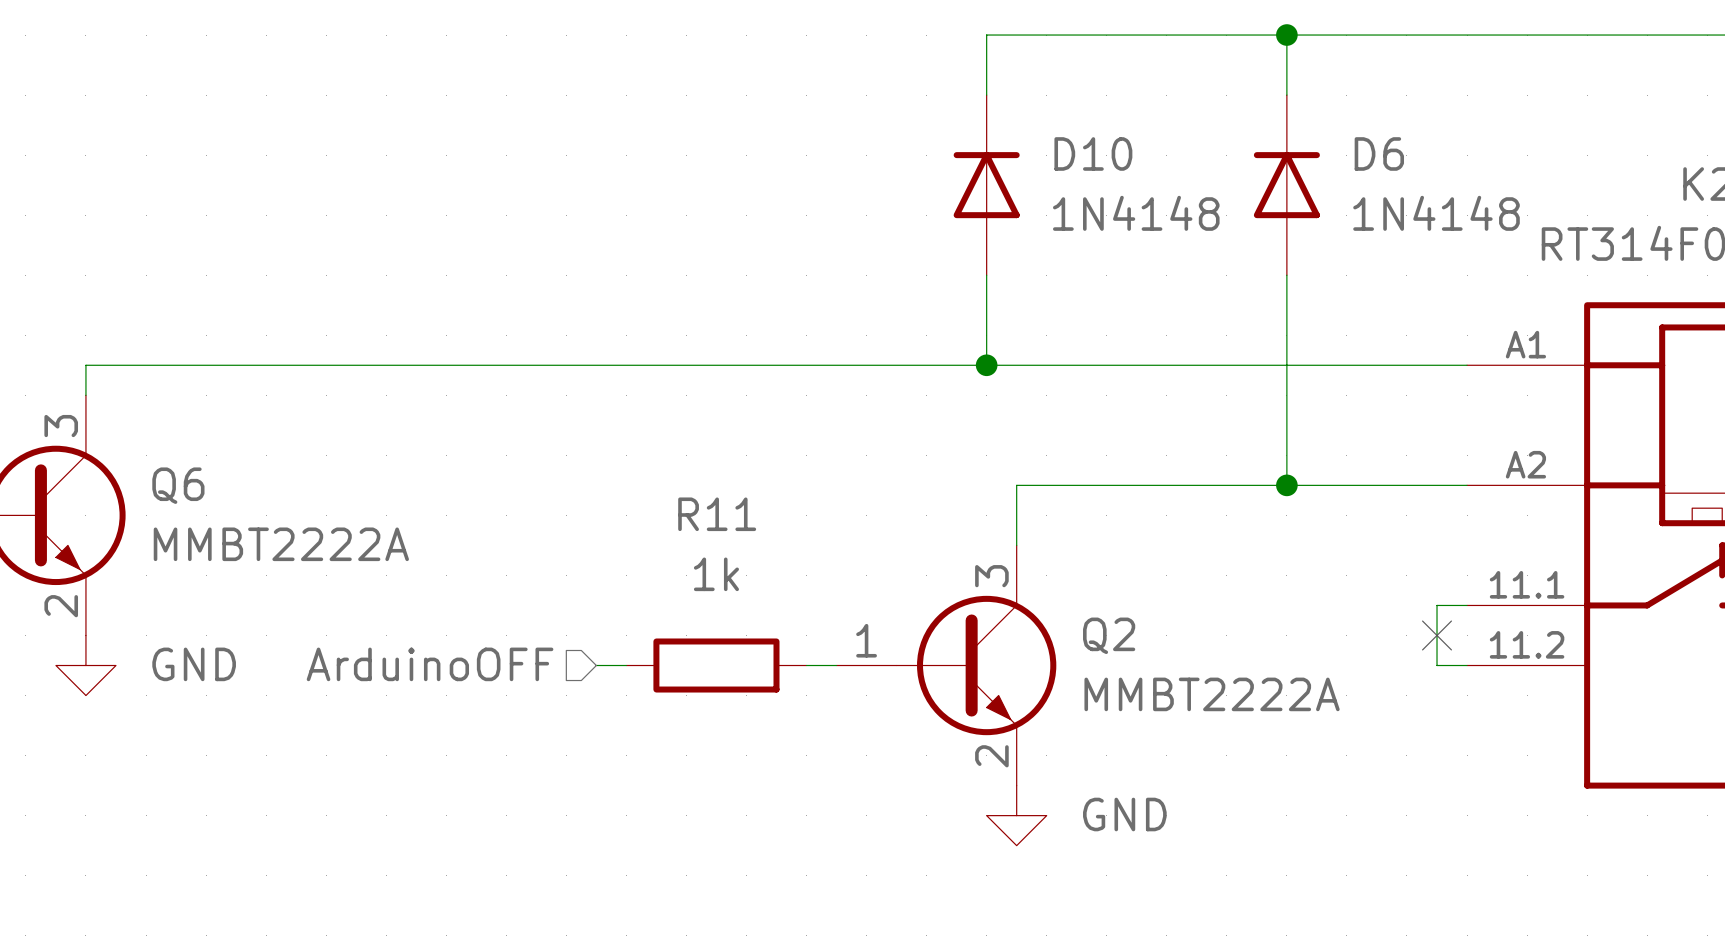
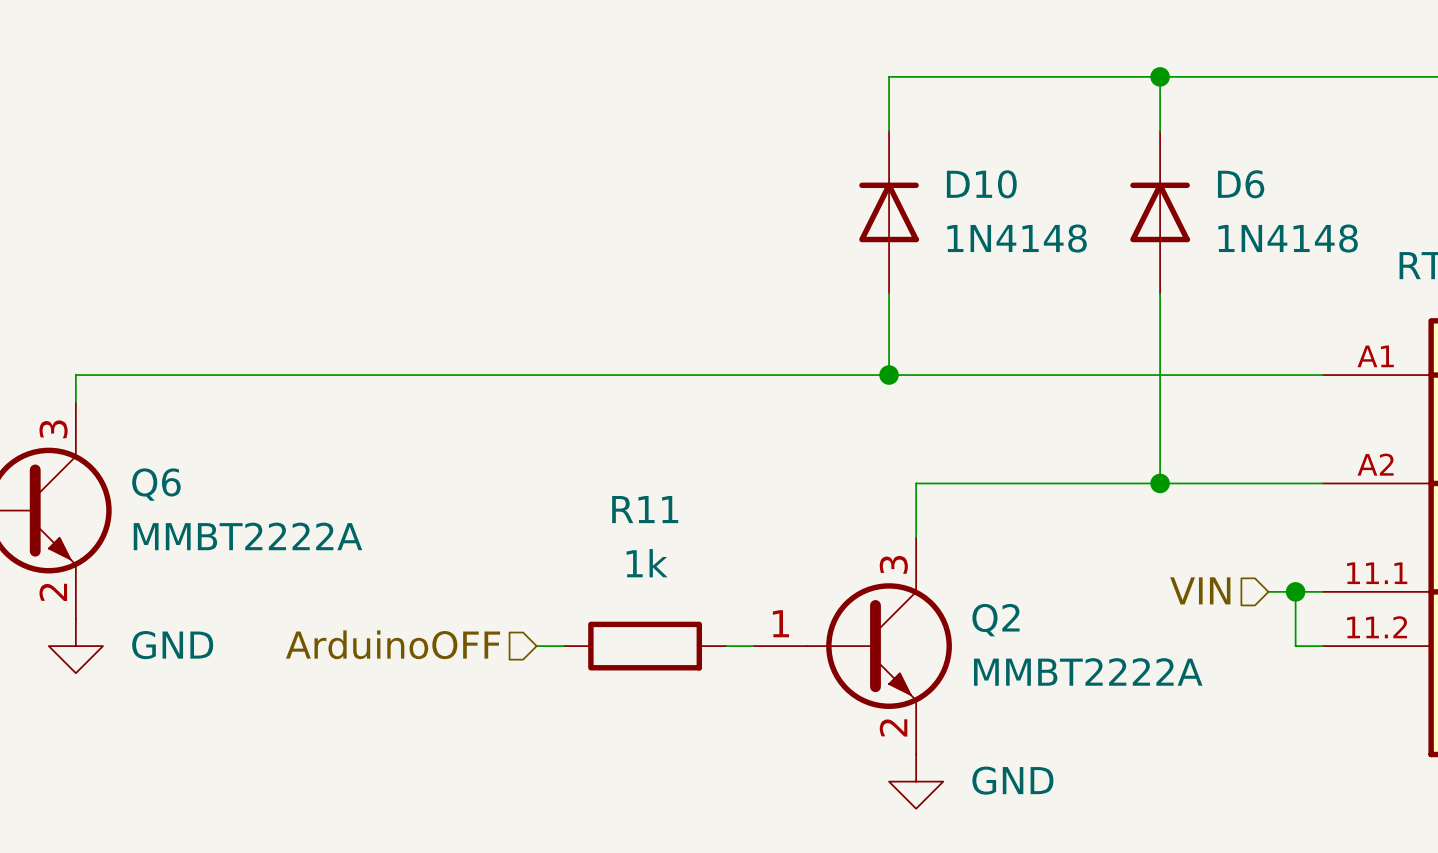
hierarchical label: none -> VIN (1200, 590)
wire: none -> (1268, 591) (1295, 591)
junction: none -> (1295, 591)
no-connect mark: (1437, 635) -> none

